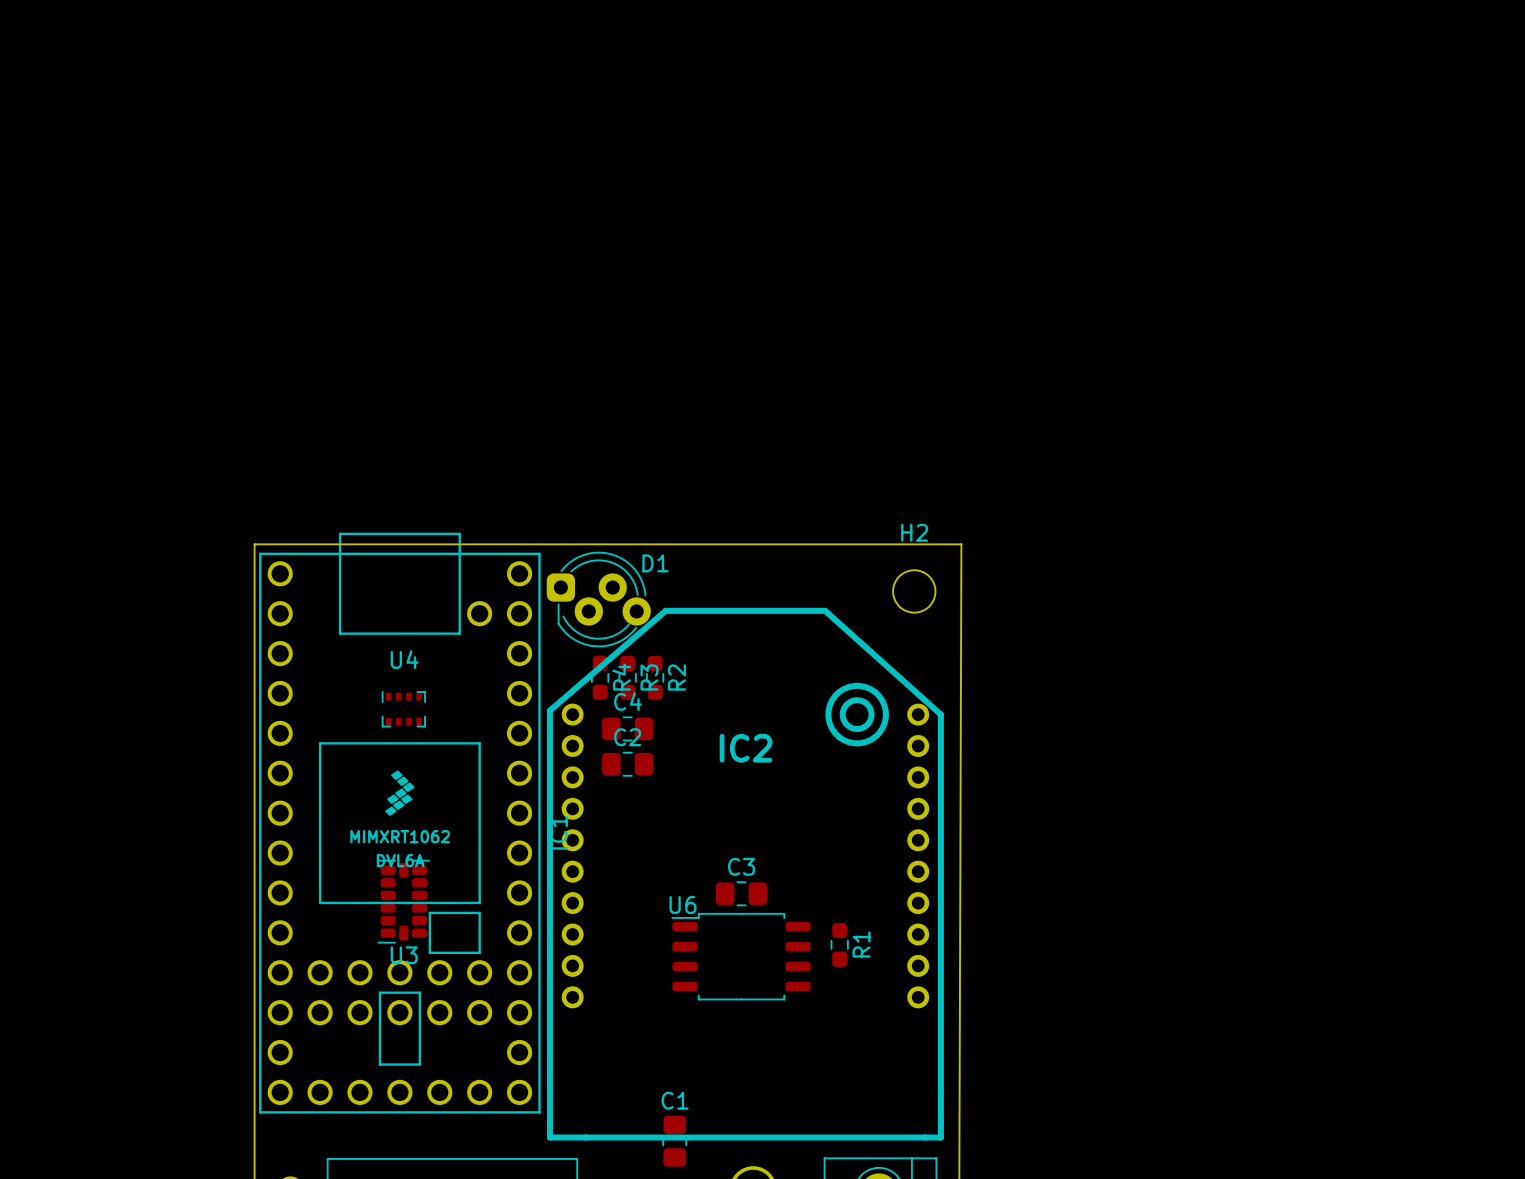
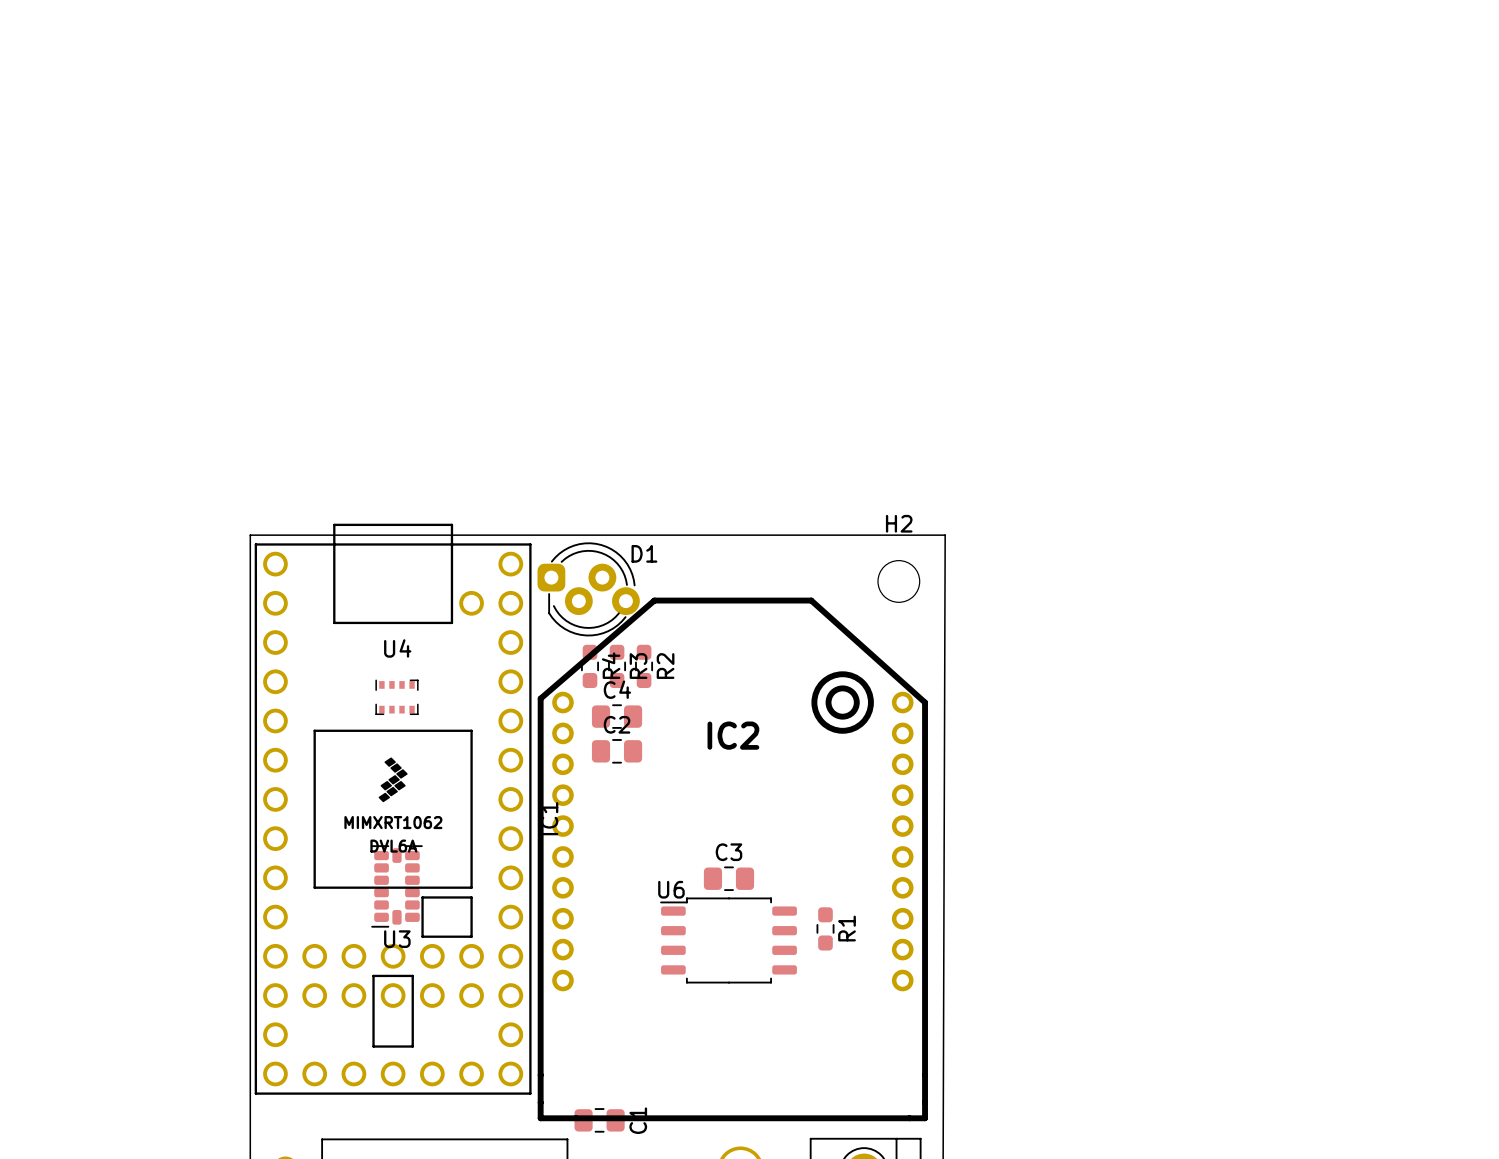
C1 rotation: 0° (674, 1141) -> 90° clockwise (599, 1120)
C1 position: (674, 1141) -> (599, 1120)

